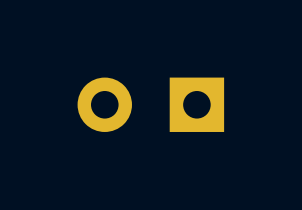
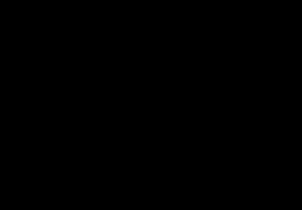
part: (150, 104) -> none

